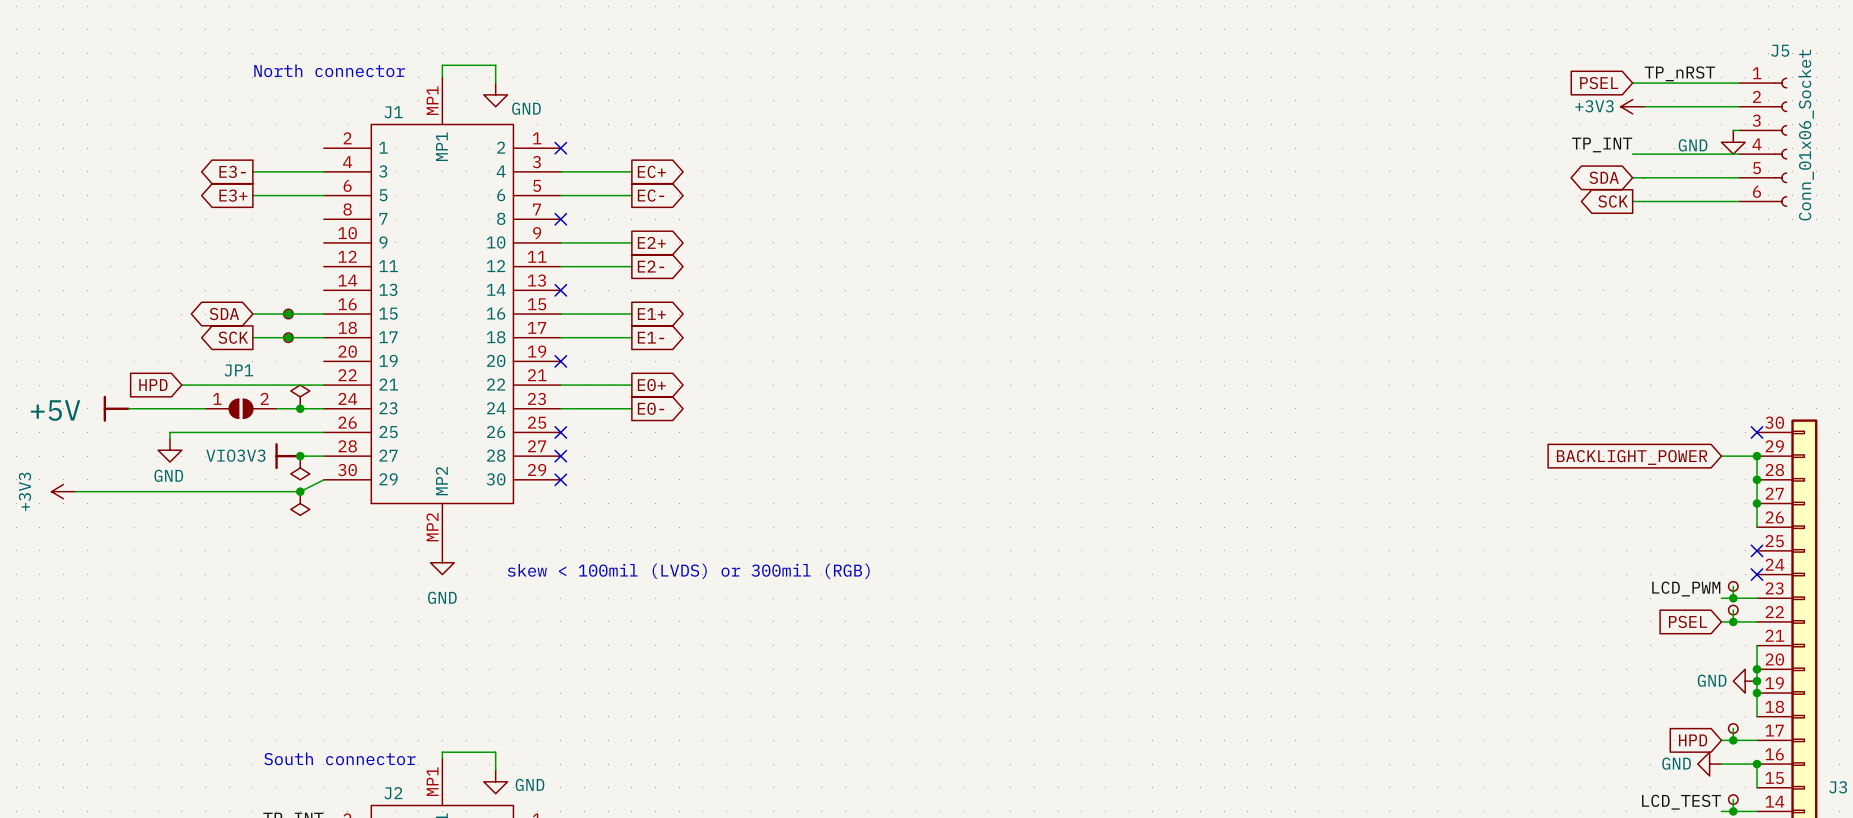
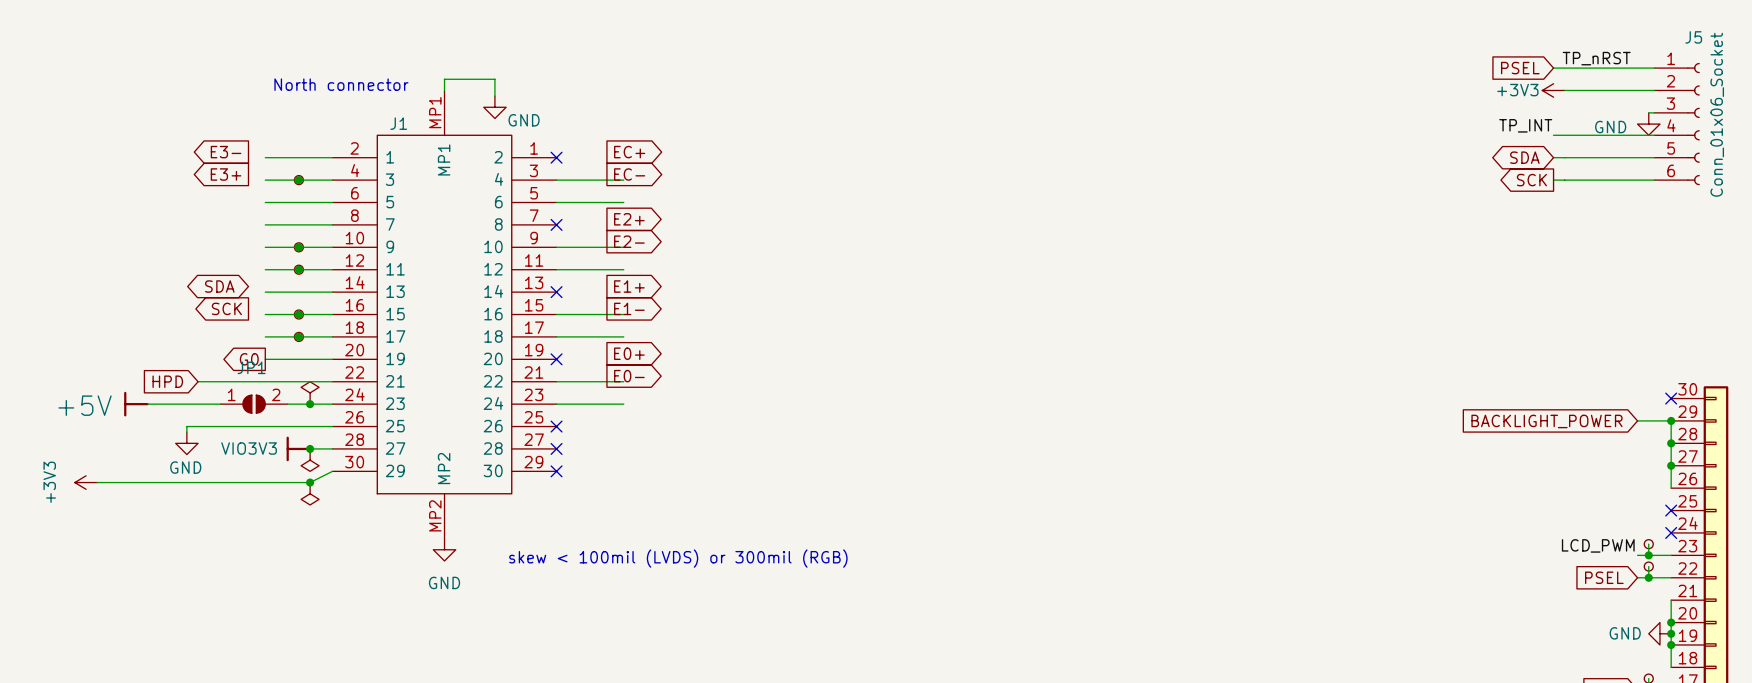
text position: North connector (329, 70) -> North connector (341, 84)
wire: (442, 77) (442, 65) (495, 65) (495, 83) -> (444, 90) (444, 79) (494, 79) (494, 96)
power symbol position: GND (495, 94) -> GND (494, 107)
no-connect mark: (560, 148) -> none
wire: (252, 171) (323, 171) -> (265, 180) (332, 180)
wire: (560, 171) (631, 171) -> (556, 180) (623, 180)
wire: none -> (265, 157) (332, 157)
no-connect mark: none -> (556, 157)
wire: (252, 195) (323, 195) -> (265, 202) (332, 202)
wire: (560, 195) (631, 195) -> (556, 202) (623, 202)
junction: none -> (298, 180)
part: none -> (298, 180)
no-connect mark: (560, 219) -> none
wire: (560, 242) (631, 242) -> (556, 247) (623, 247)
wire: none -> (265, 224) (332, 224)
no-connect mark: none -> (556, 224)
wire: (560, 266) (631, 266) -> (556, 269) (623, 269)
wire: none -> (265, 247) (332, 247)
junction: none -> (298, 247)
part: none -> (298, 247)
no-connect mark: (560, 290) -> none
wire: none -> (265, 269) (332, 269)
junction: none -> (298, 269)
part: none -> (298, 269)
wire: (252, 314) (323, 314) -> (265, 314) (332, 314)
junction: (288, 314) -> none
part: (288, 314) -> none
J1 position: (442, 314) -> (444, 314)
wire: (560, 314) (631, 314) -> (556, 314) (623, 314)
wire: none -> (265, 292) (332, 292)
no-connect mark: none -> (556, 292)
wire: (252, 337) (323, 337) -> (265, 336) (332, 336)
junction: (288, 337) -> none
part: (288, 337) -> none
wire: (560, 337) (631, 337) -> (556, 336) (623, 336)
junction: none -> (298, 314)
part: none -> (298, 314)
no-connect mark: (560, 361) -> none
junction: none -> (298, 336)
part: none -> (298, 336)
global label position: HPD (153, 385) -> HPD (167, 381)
wire: (181, 385) (323, 385) -> (198, 381) (332, 381)
wire: (560, 385) (631, 385) -> (556, 381) (623, 381)
global label: none -> G0 (249, 359)
wire: none -> (265, 359) (332, 359)
no-connect mark: none -> (556, 359)
power symbol: (300, 396) -> none
power symbol position: +5V (116, 408) -> +5V (136, 404)
wire: (128, 408) (205, 408) -> (147, 404) (220, 404)
JP1 position: (241, 408) -> (254, 404)
wire: (276, 408) (323, 408) -> (287, 404) (332, 404)
junction: (300, 408) -> none
wire: (560, 408) (631, 408) -> (556, 404) (623, 404)
power symbol: none -> (310, 392)
wire: (323, 432) (169, 432) (169, 438) -> (332, 426) (186, 426) (186, 432)
no-connect mark: (560, 432) -> none
junction: none -> (310, 404)
power symbol position: GND (169, 450) -> GND (186, 443)
power symbol position: VIO3V3 (288, 456) -> VIO3V3 (298, 448)
wire: (300, 456) (323, 456) -> (310, 448) (332, 448)
junction: (300, 456) -> none
no-connect mark: (560, 456) -> none
no-connect mark: none -> (556, 426)
power symbol: (300, 467) -> none
wire: (323, 479) (300, 491) (75, 491) -> (332, 471) (310, 482) (97, 482)
no-connect mark: (560, 479) -> none
junction: none -> (310, 448)
no-connect mark: none -> (556, 448)
power symbol position: +3V3 (63, 491) -> +3V3 (86, 482)
junction: (300, 491) -> none
power symbol: none -> (310, 460)
power symbol: (300, 503) -> none
no-connect mark: none -> (556, 471)
junction: none -> (310, 482)
power symbol: none -> (310, 493)
power symbol position: GND (442, 562) -> GND (444, 549)
text position: skew < 100mil (LVDS) or 300mil (RGB) (688, 571) -> skew < 100mil (LVDS) or 300mil (RGB) (678, 558)

